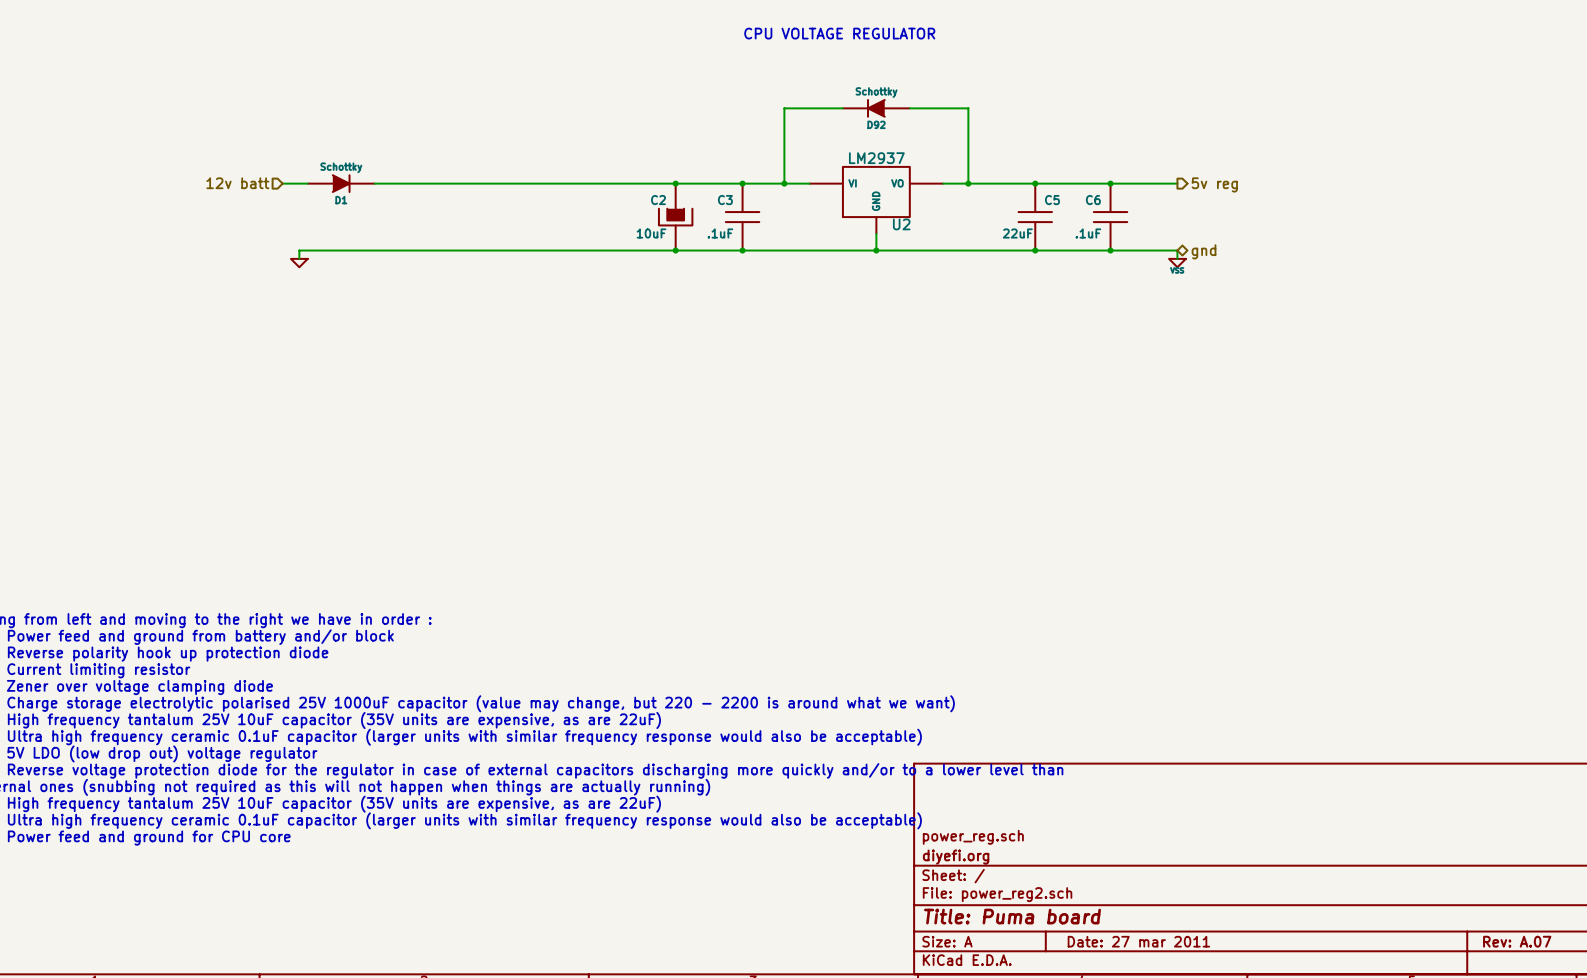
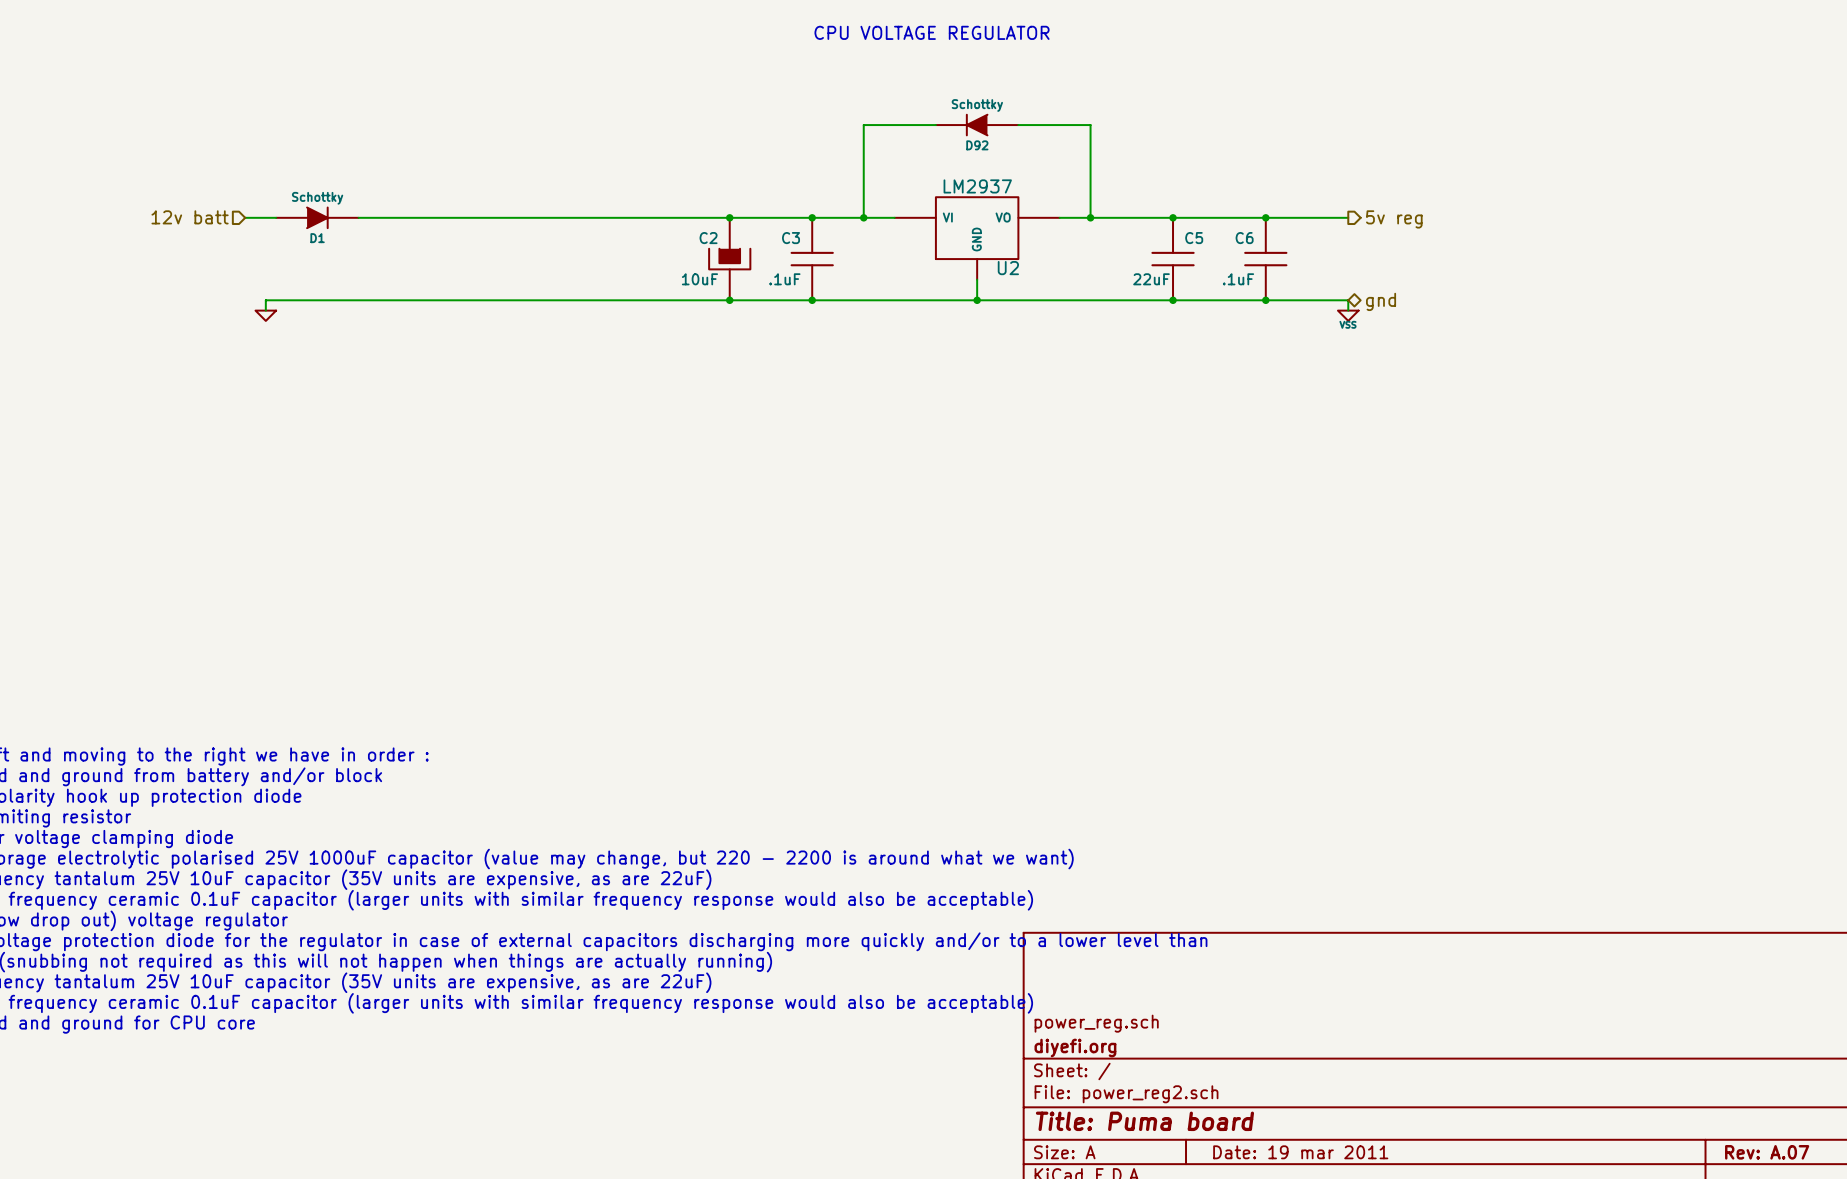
title block: Date: 27 mar 2011 (1138, 941) -> Date: 19 mar 2011 (1300, 1152)

